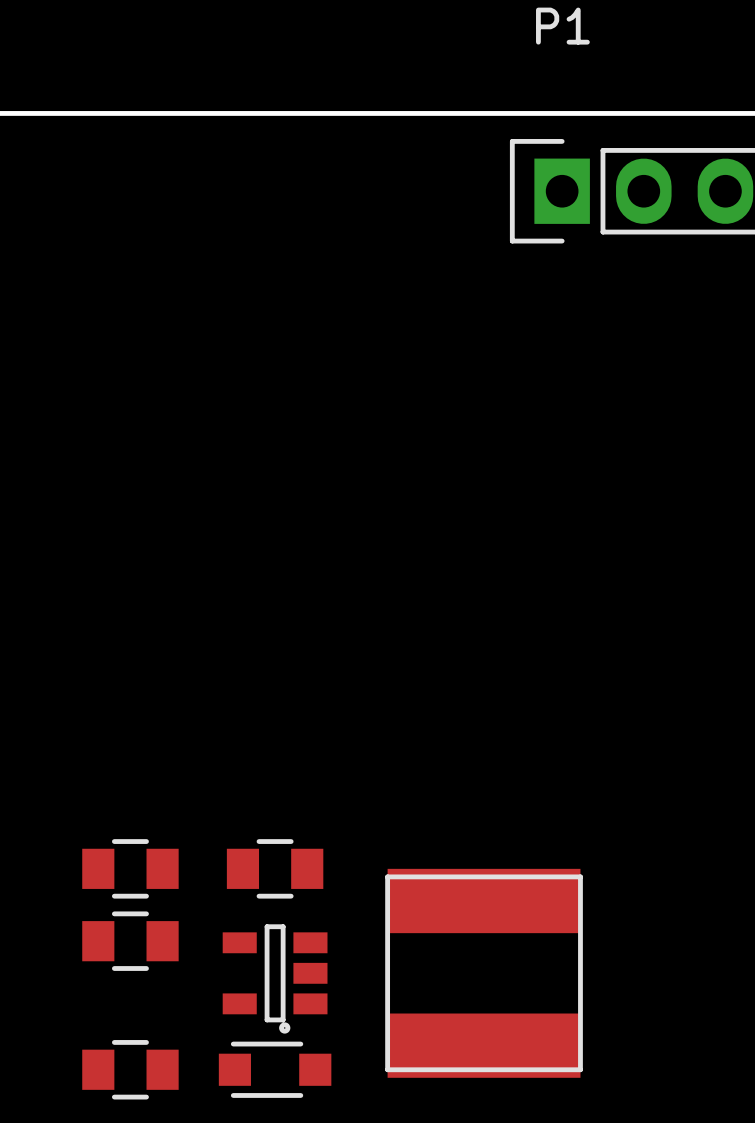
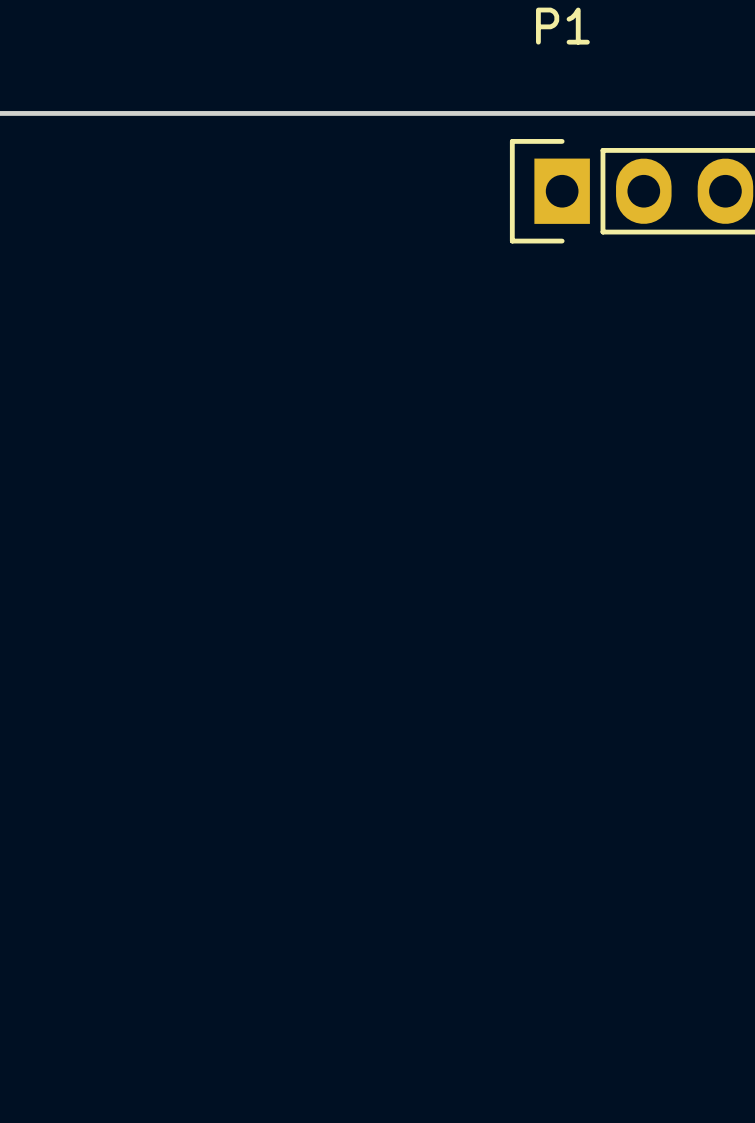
part: (130, 868) -> none
part: (275, 868) -> none
part: (130, 941) -> none
part: (484, 973) -> none
part: (275, 978) -> none
part: (130, 1069) -> none
part: (275, 1069) -> none

